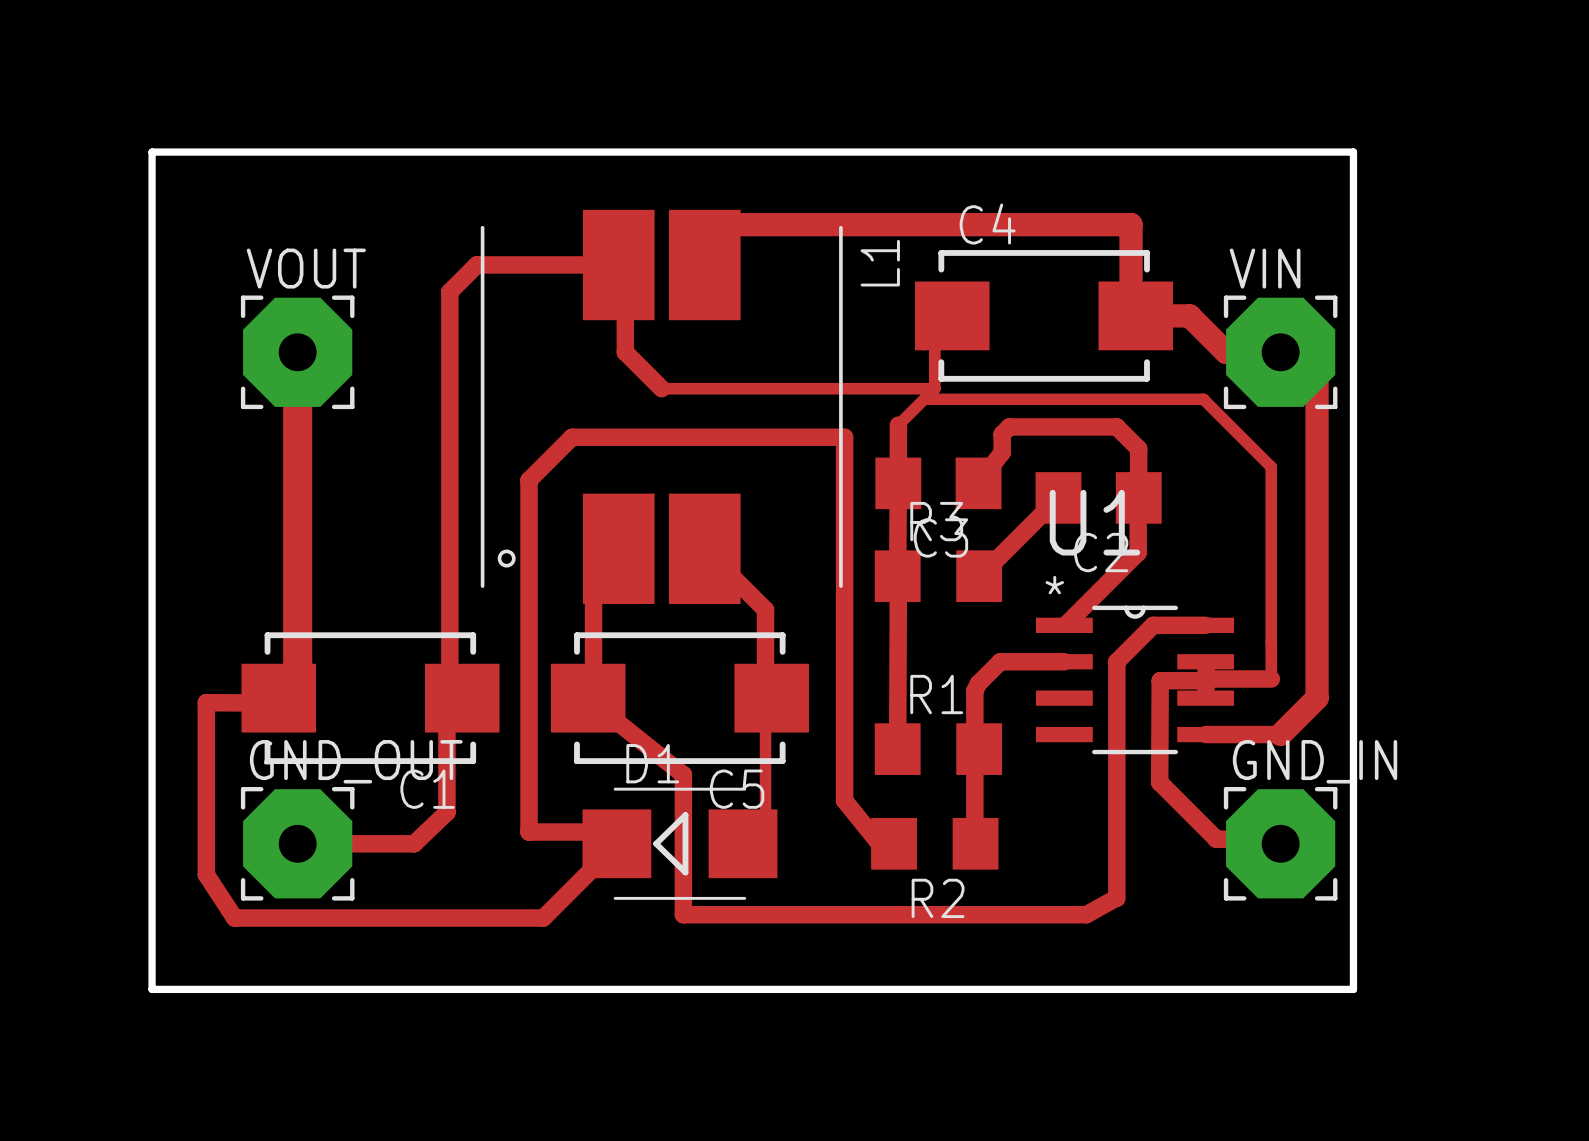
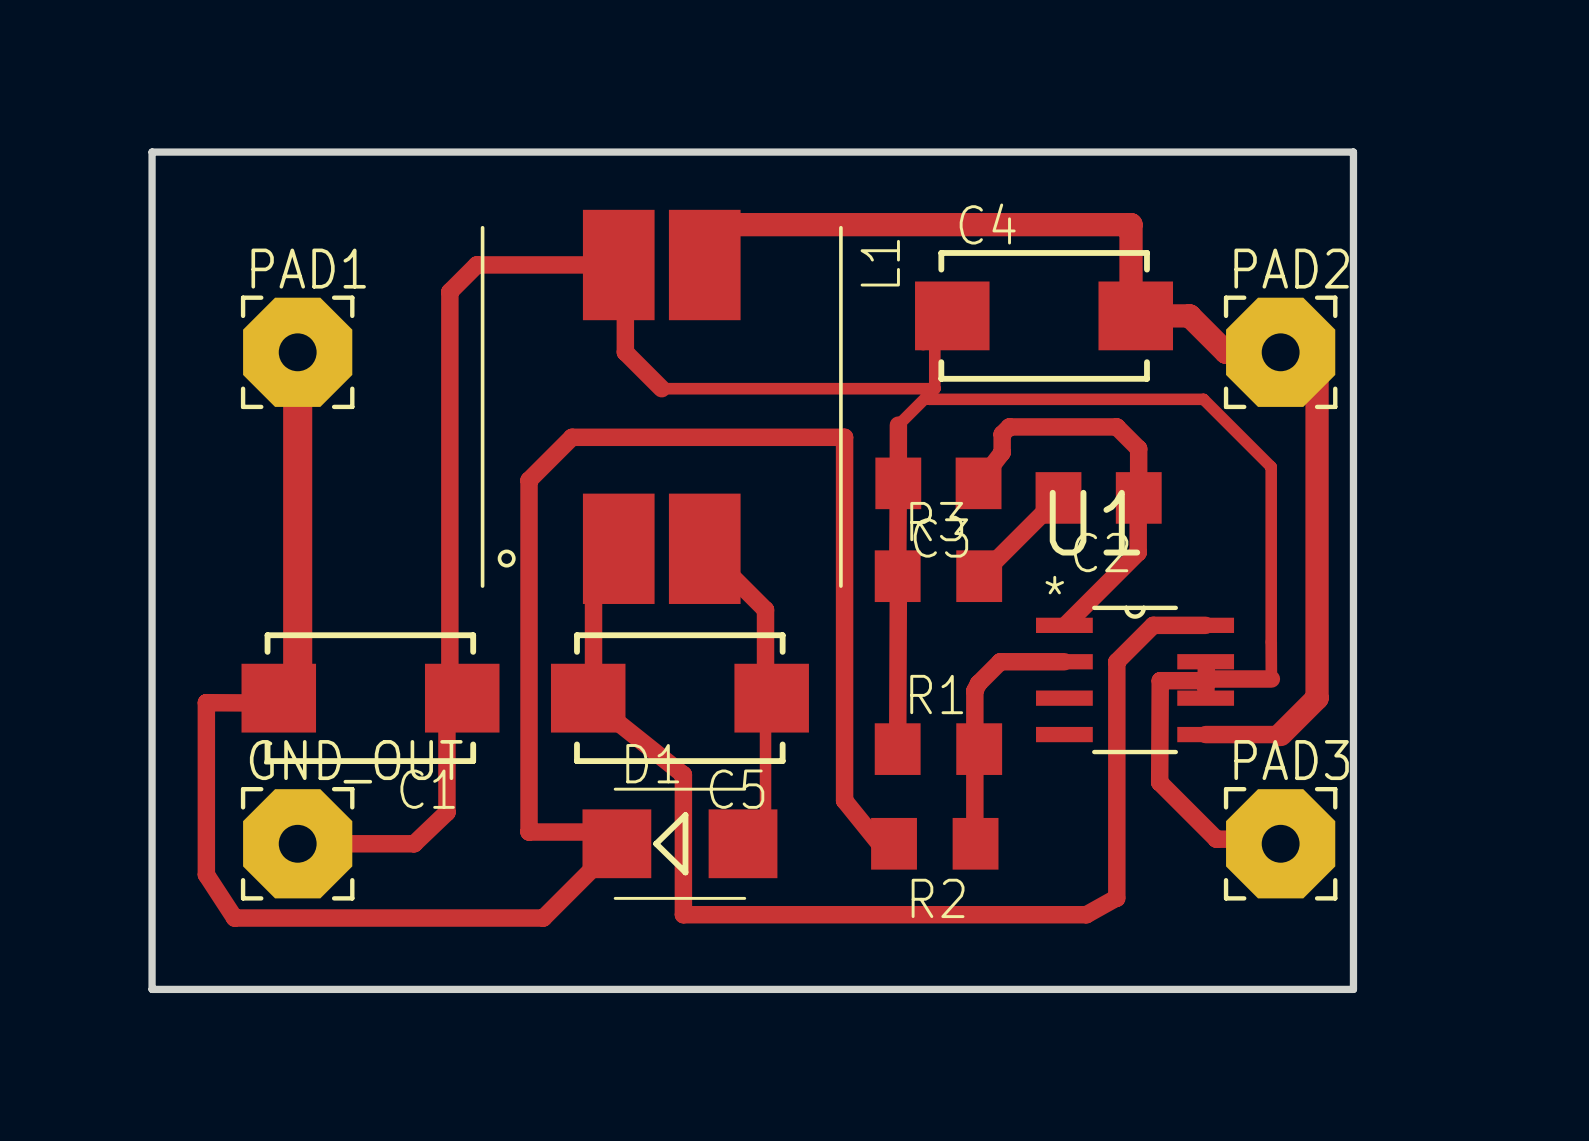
VOUT name: VOUT (306, 268) -> PAD1 (308, 268)
VIN name: VIN (1265, 268) -> PAD2 (1291, 268)
GND_IN name: GND_IN (1315, 761) -> PAD3 (1291, 760)

